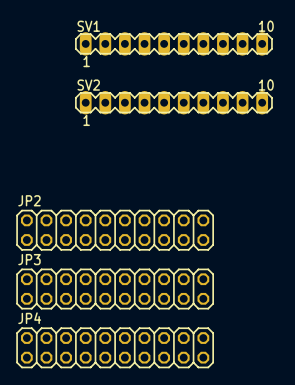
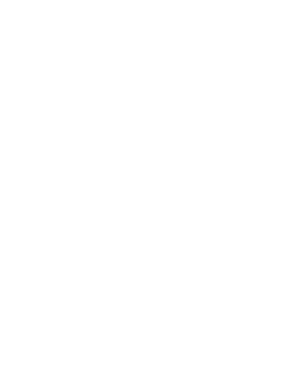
SV1: (173, 43) -> none
SV2: (173, 102) -> none
JP2: (115, 230) -> none
JP3: (115, 289) -> none
JP4: (115, 347) -> none

